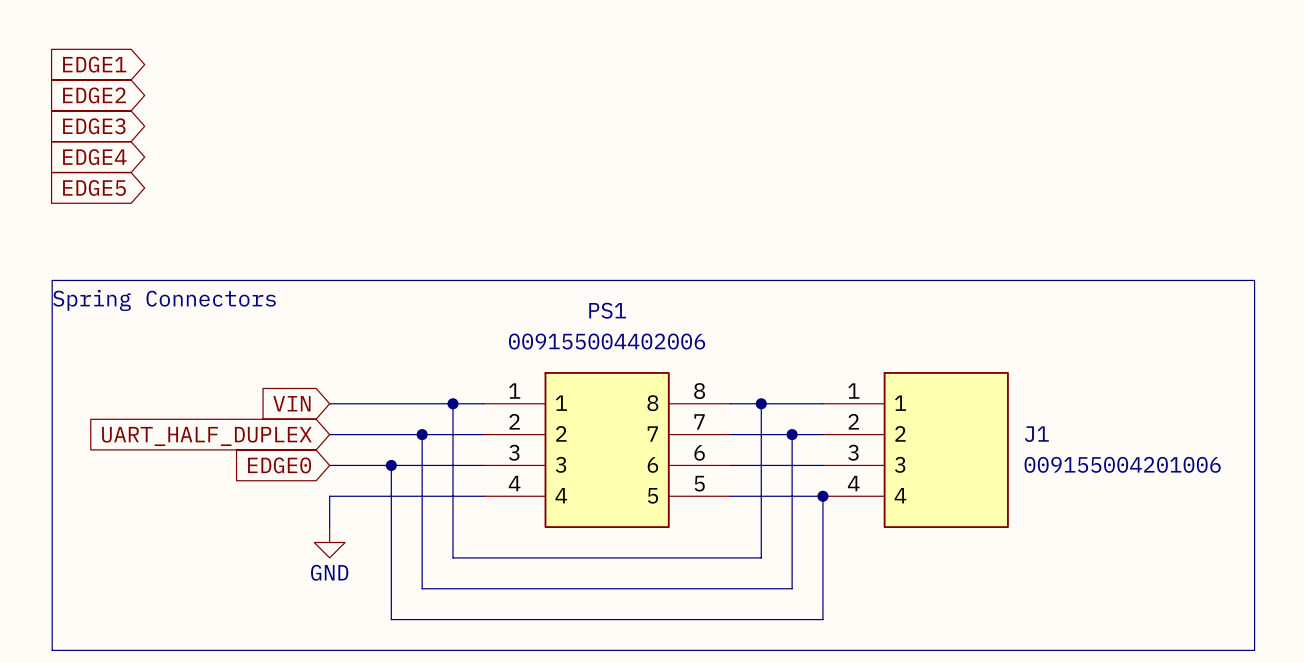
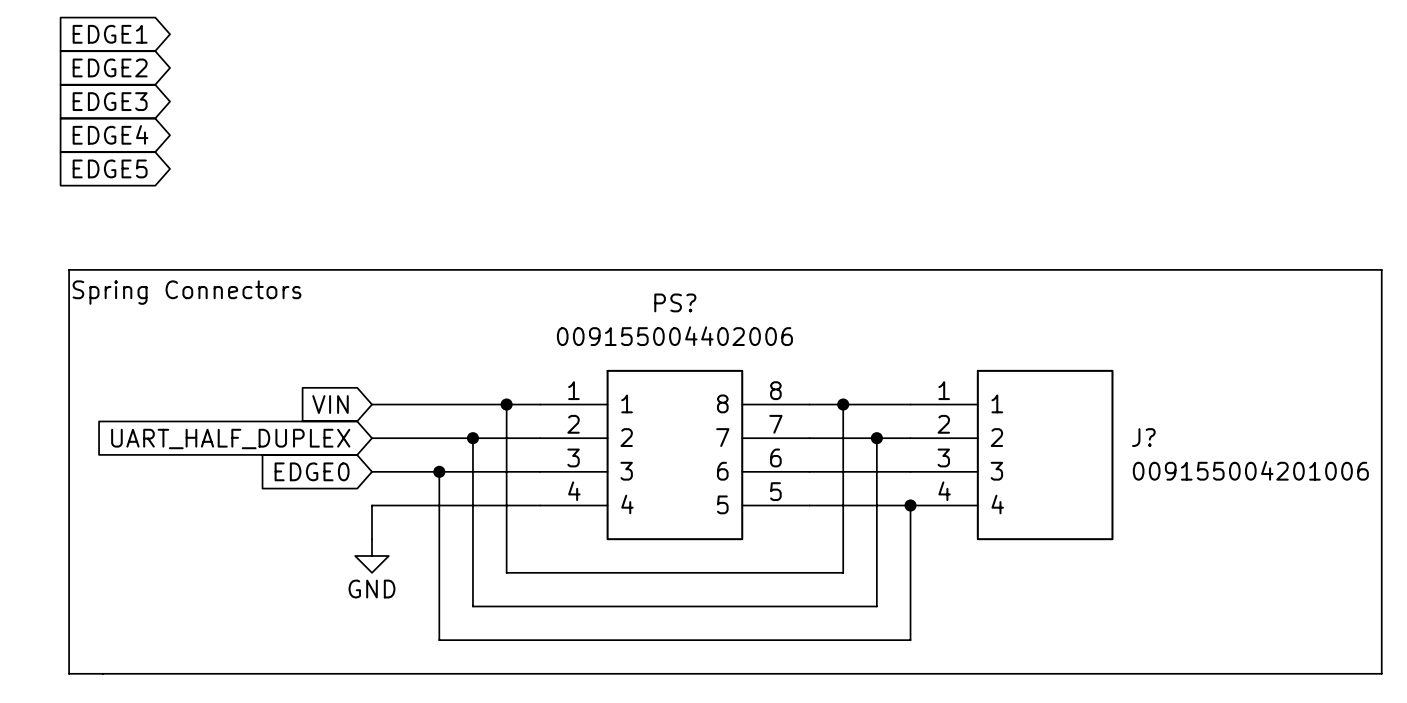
PS1 name: PS1 (607, 310) -> PS? (675, 302)
J1 name: J1 (1036, 434) -> J? (1143, 437)

